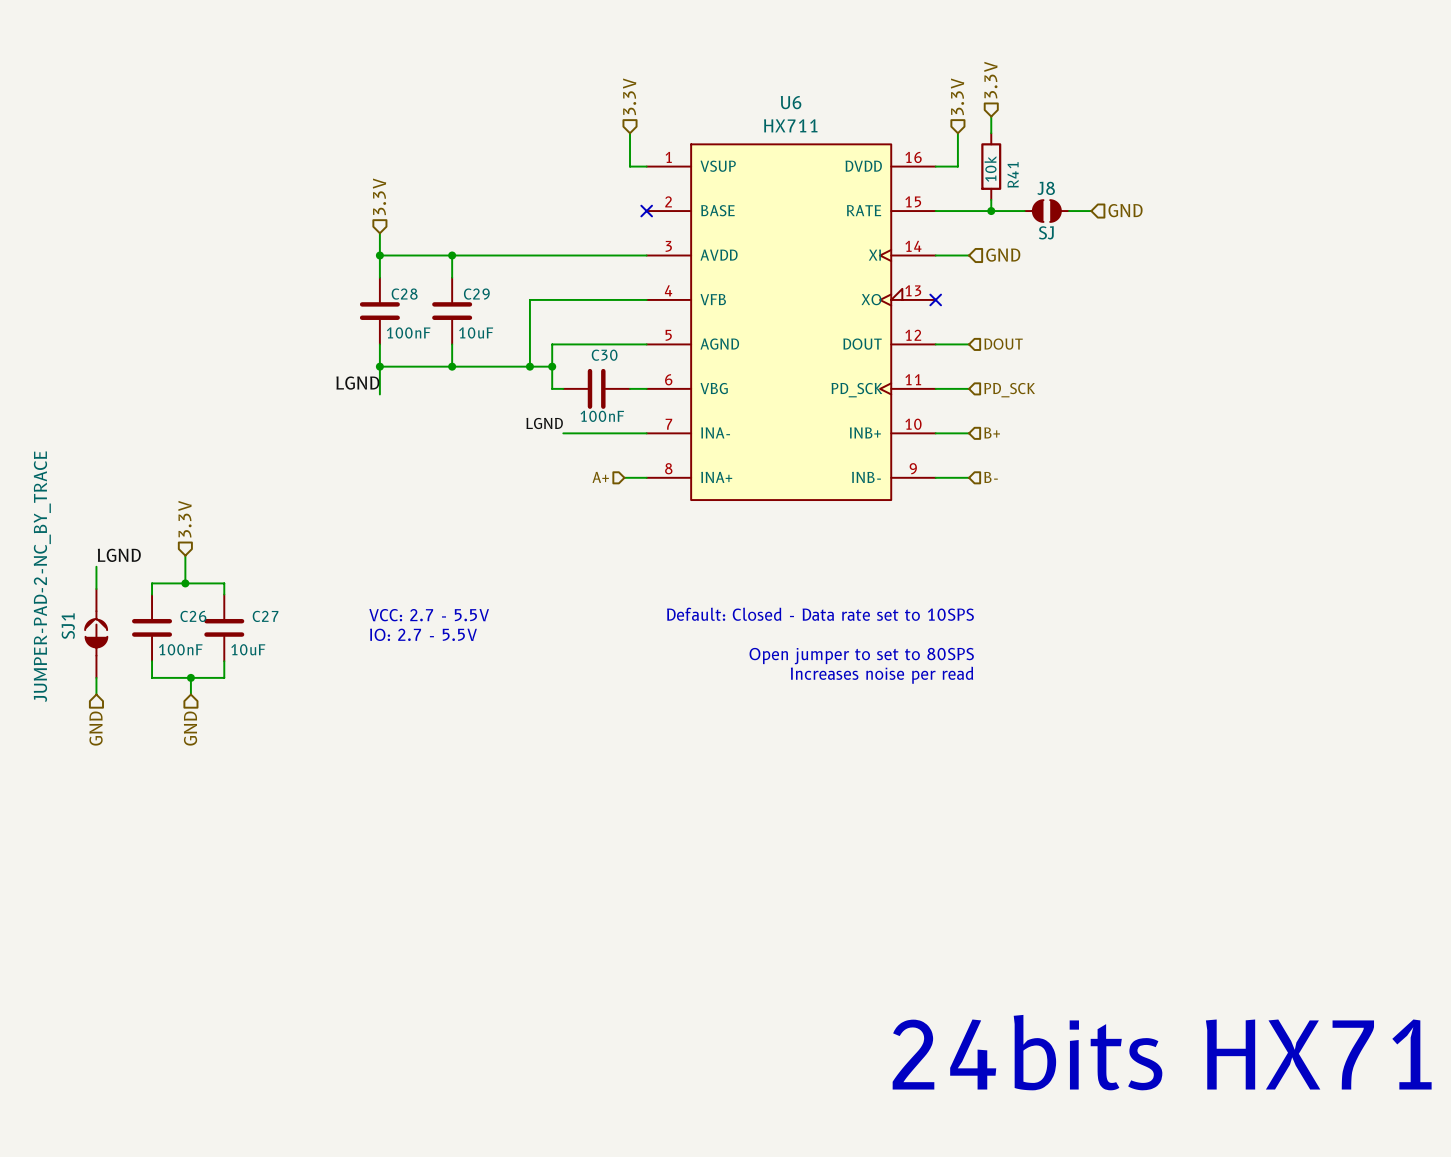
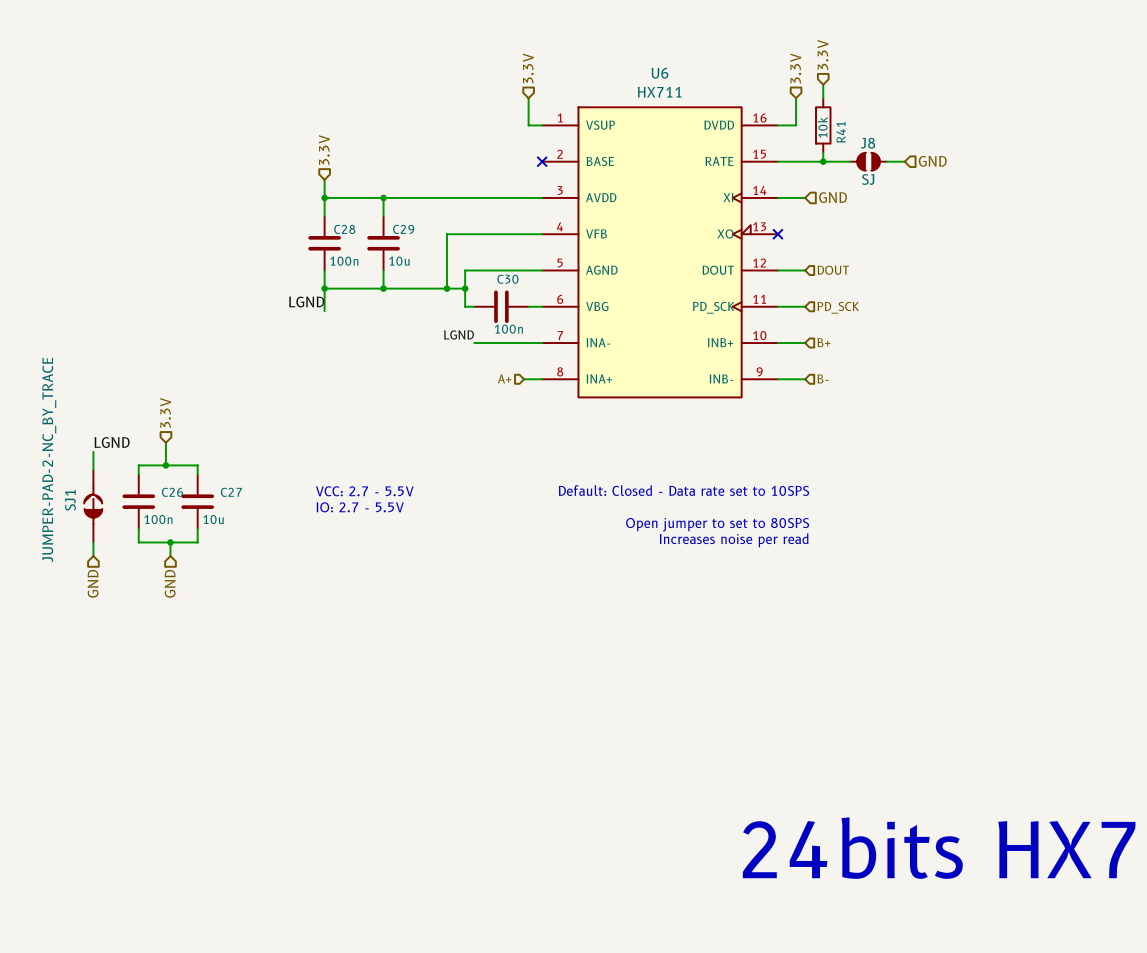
C28 value: 100nF (408, 332) -> 100n (344, 261)
C29 value: 10uF (476, 332) -> 10u (399, 261)
C30 value: 100nF (602, 416) -> 100n (508, 329)
C26 value: 100nF (180, 649) -> 100n (158, 519)
C27 value: 10uF (248, 649) -> 10u (213, 519)

